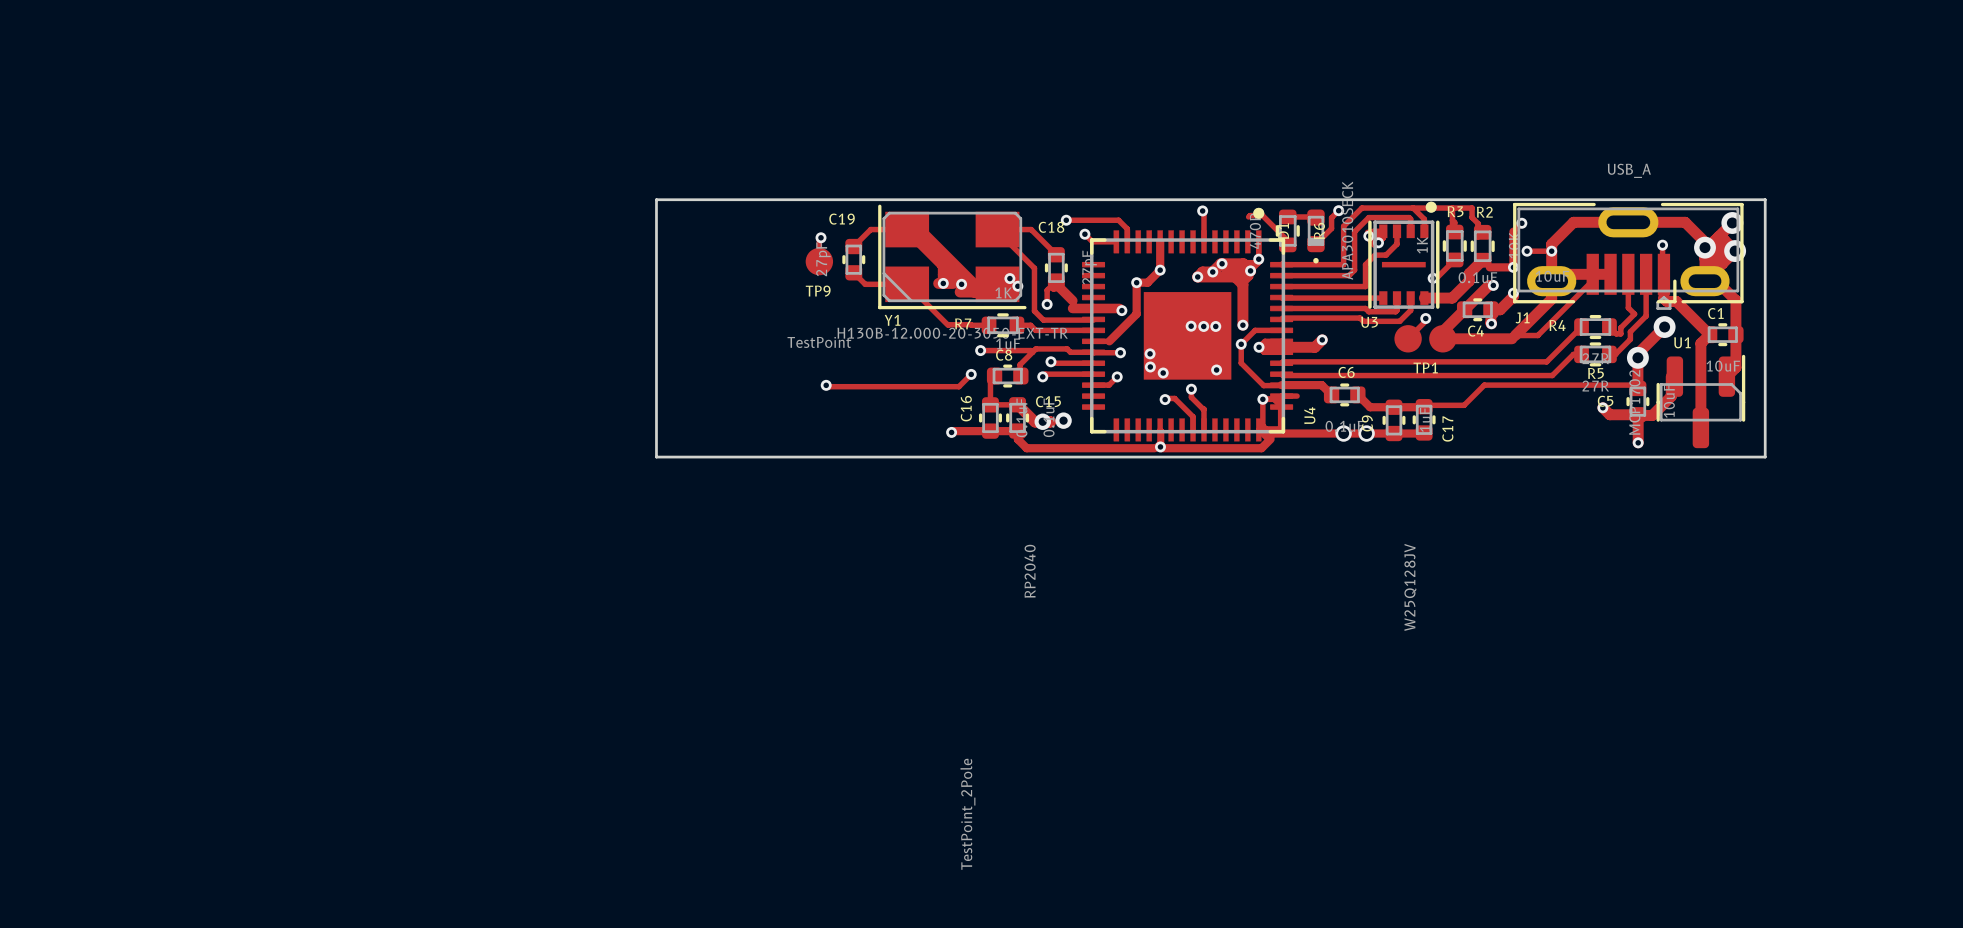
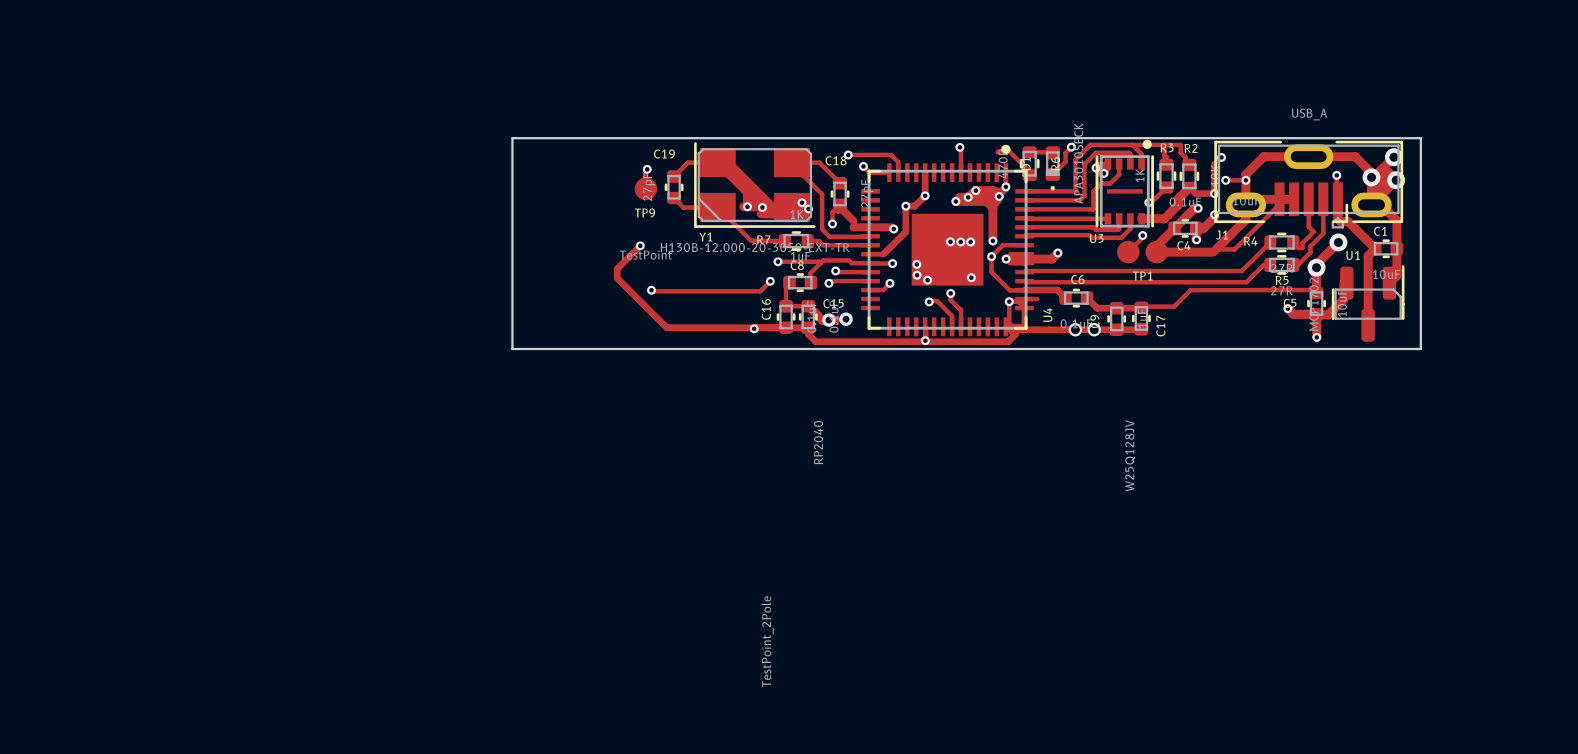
track: none -> (640, 245) (617, 268) (617, 278) (666, 327) (755, 327)
via: none -> (640, 245)

